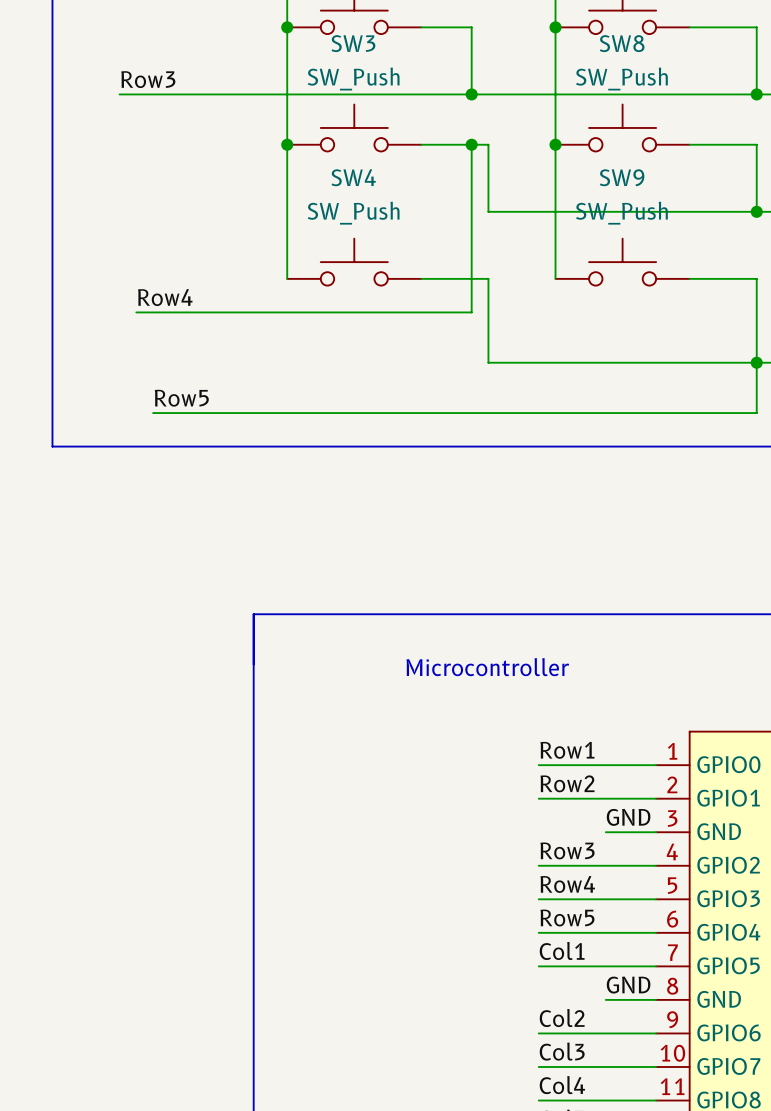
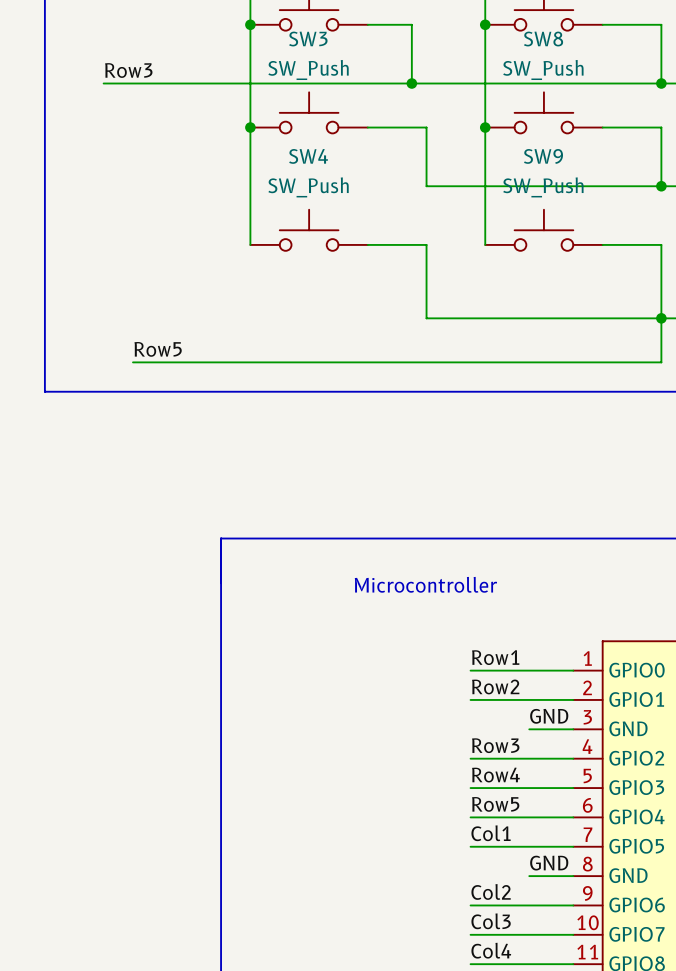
wire: (471, 144) (471, 312) (136, 312) -> none
junction: (471, 144) -> none
label: Row4 (165, 297) -> none

